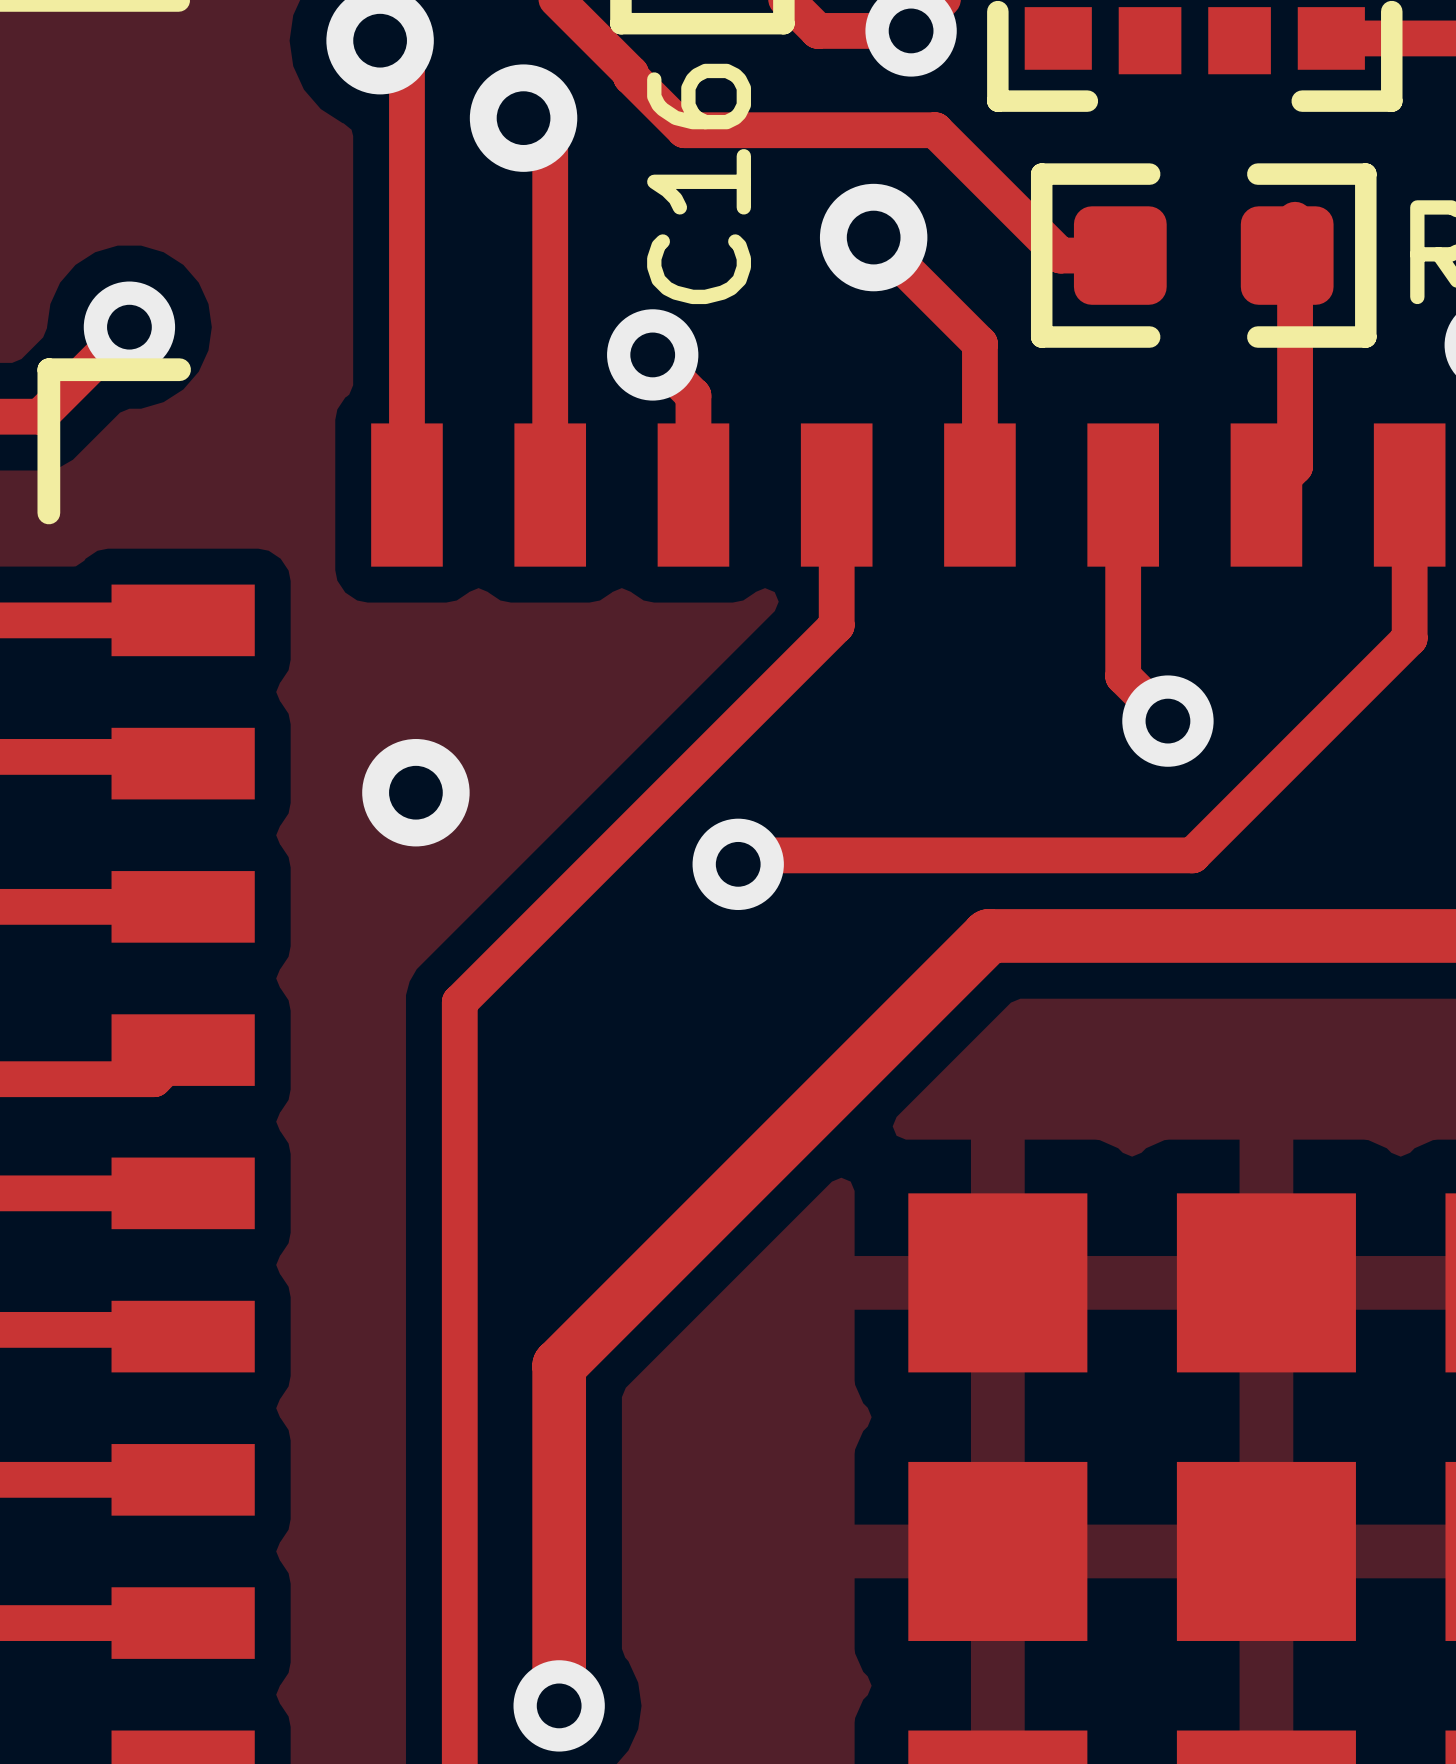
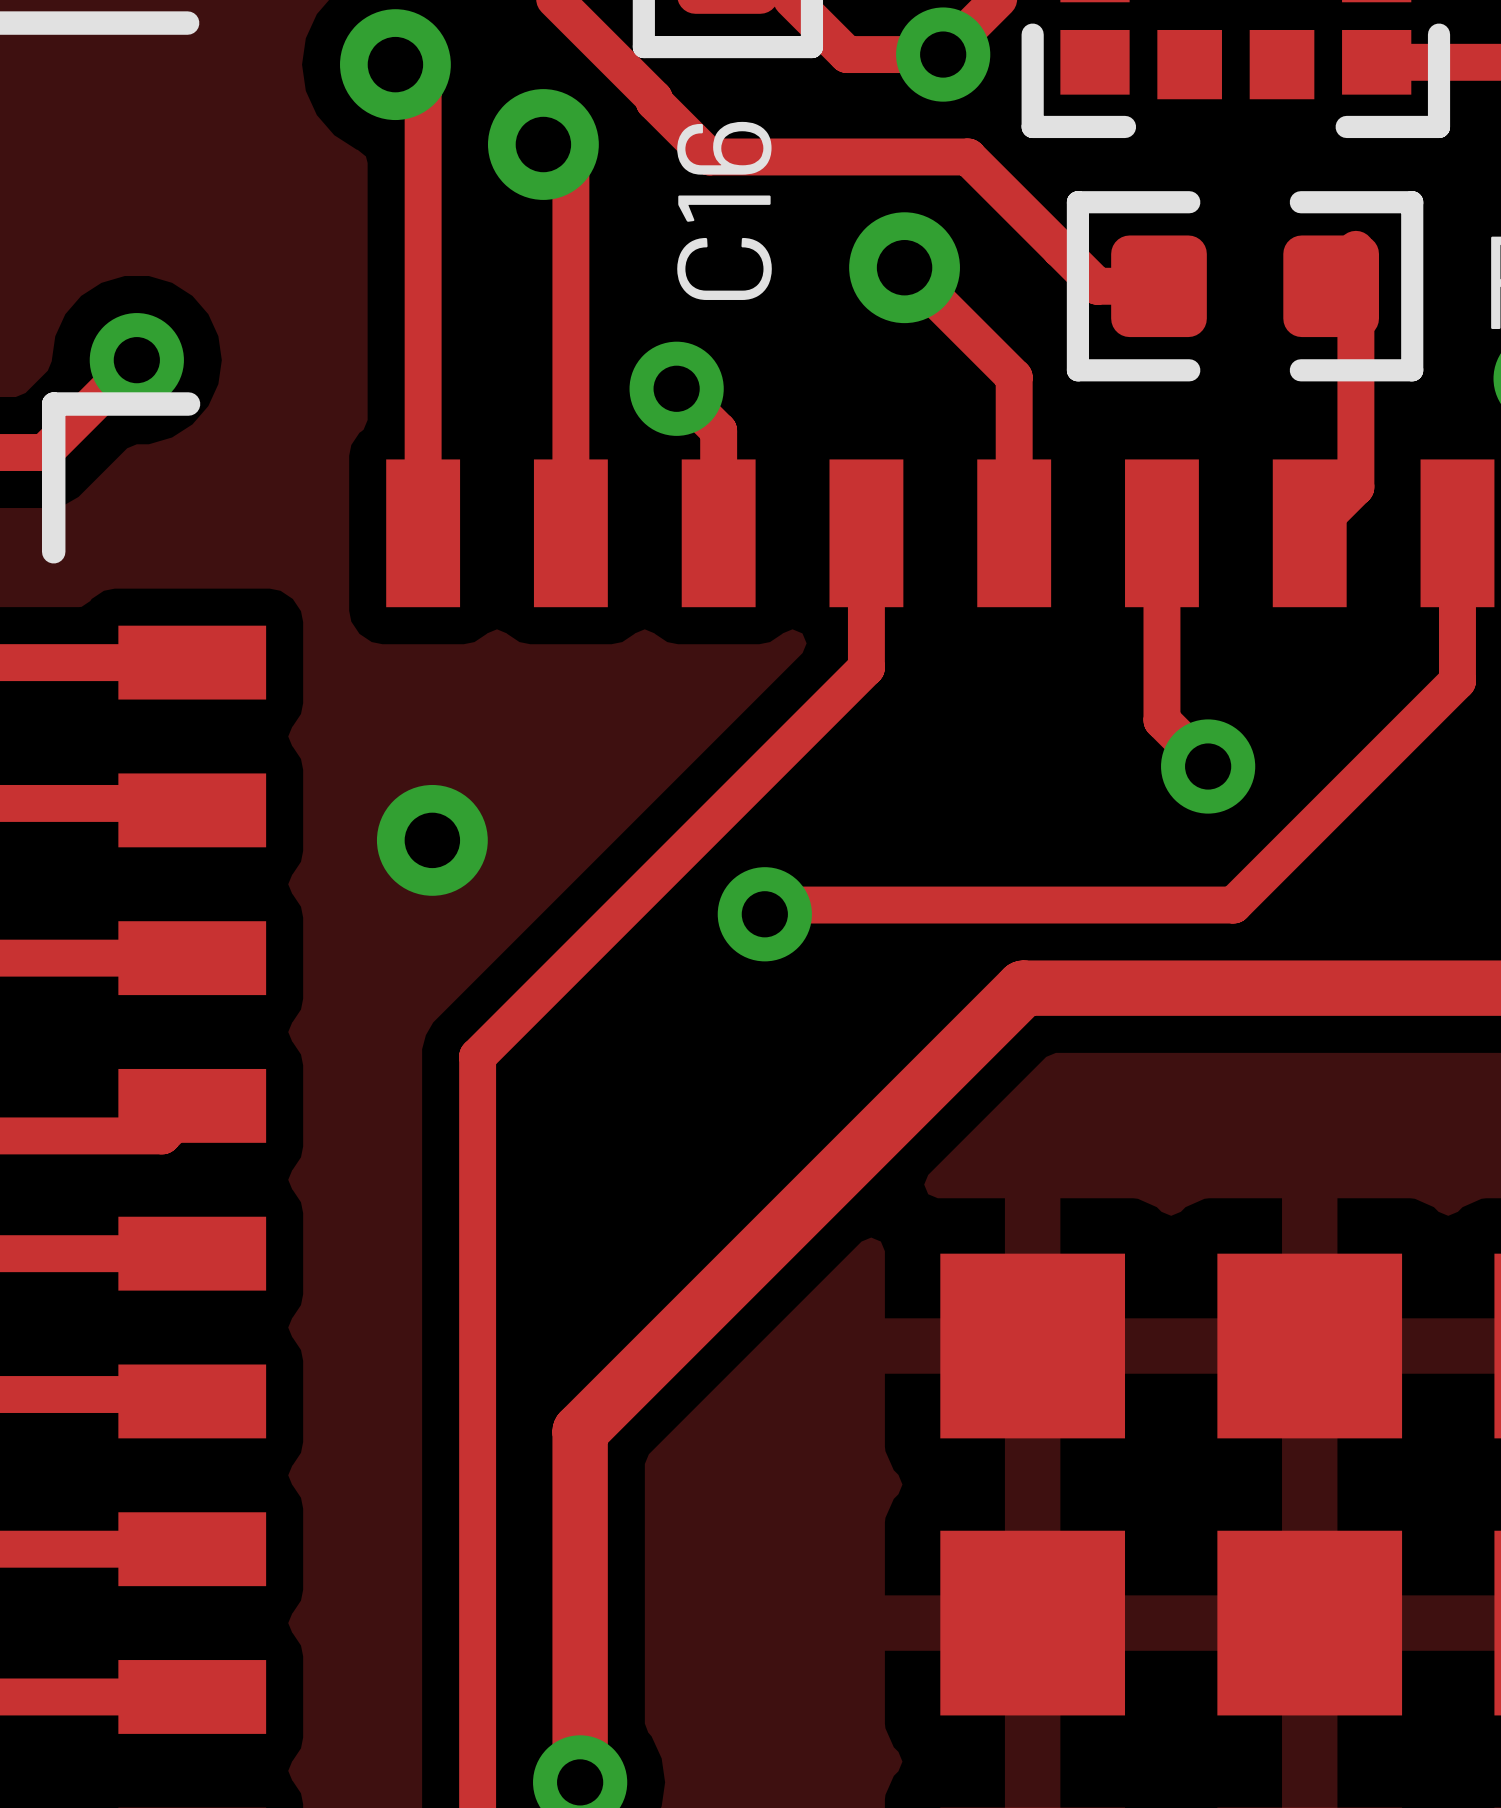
track: (1295, 219) (1295, 466) -> (1355, 249) (1355, 487) (1339, 503)

